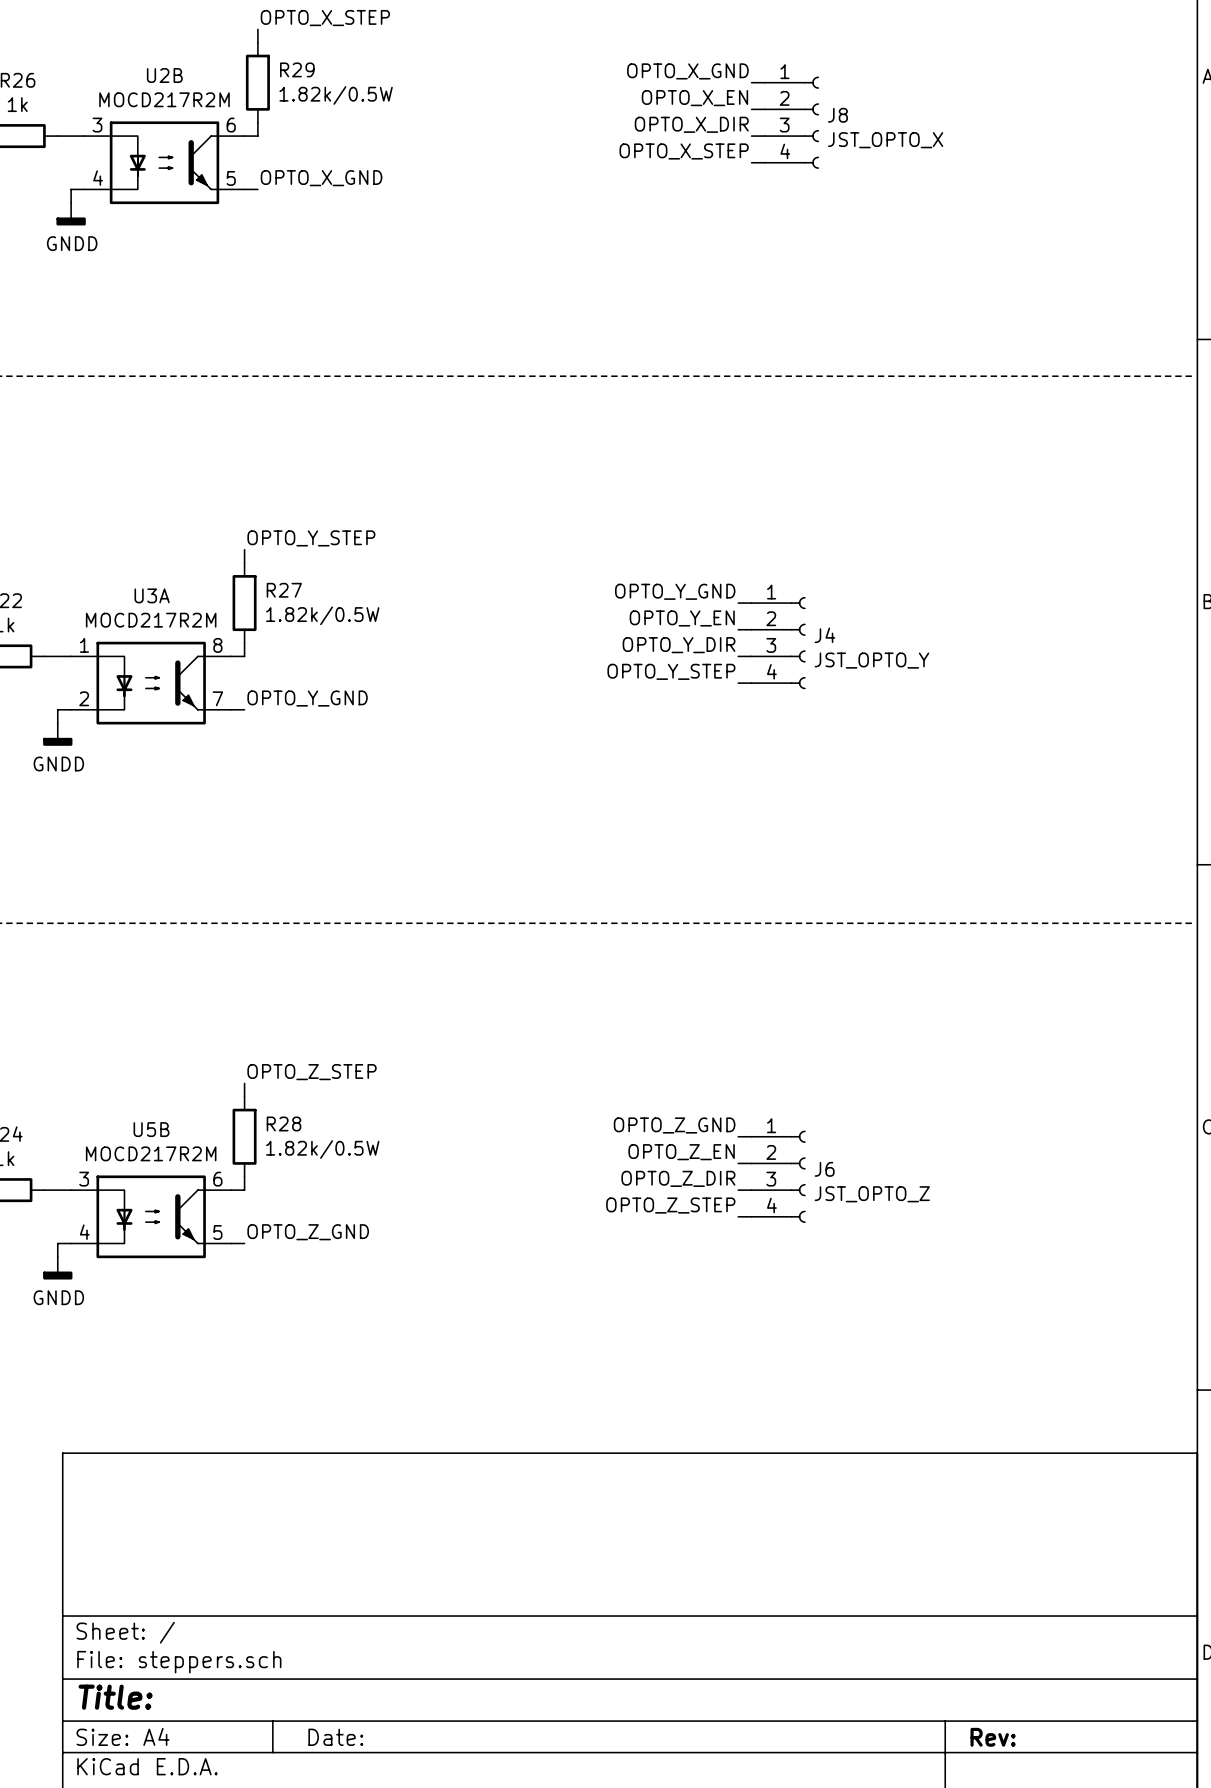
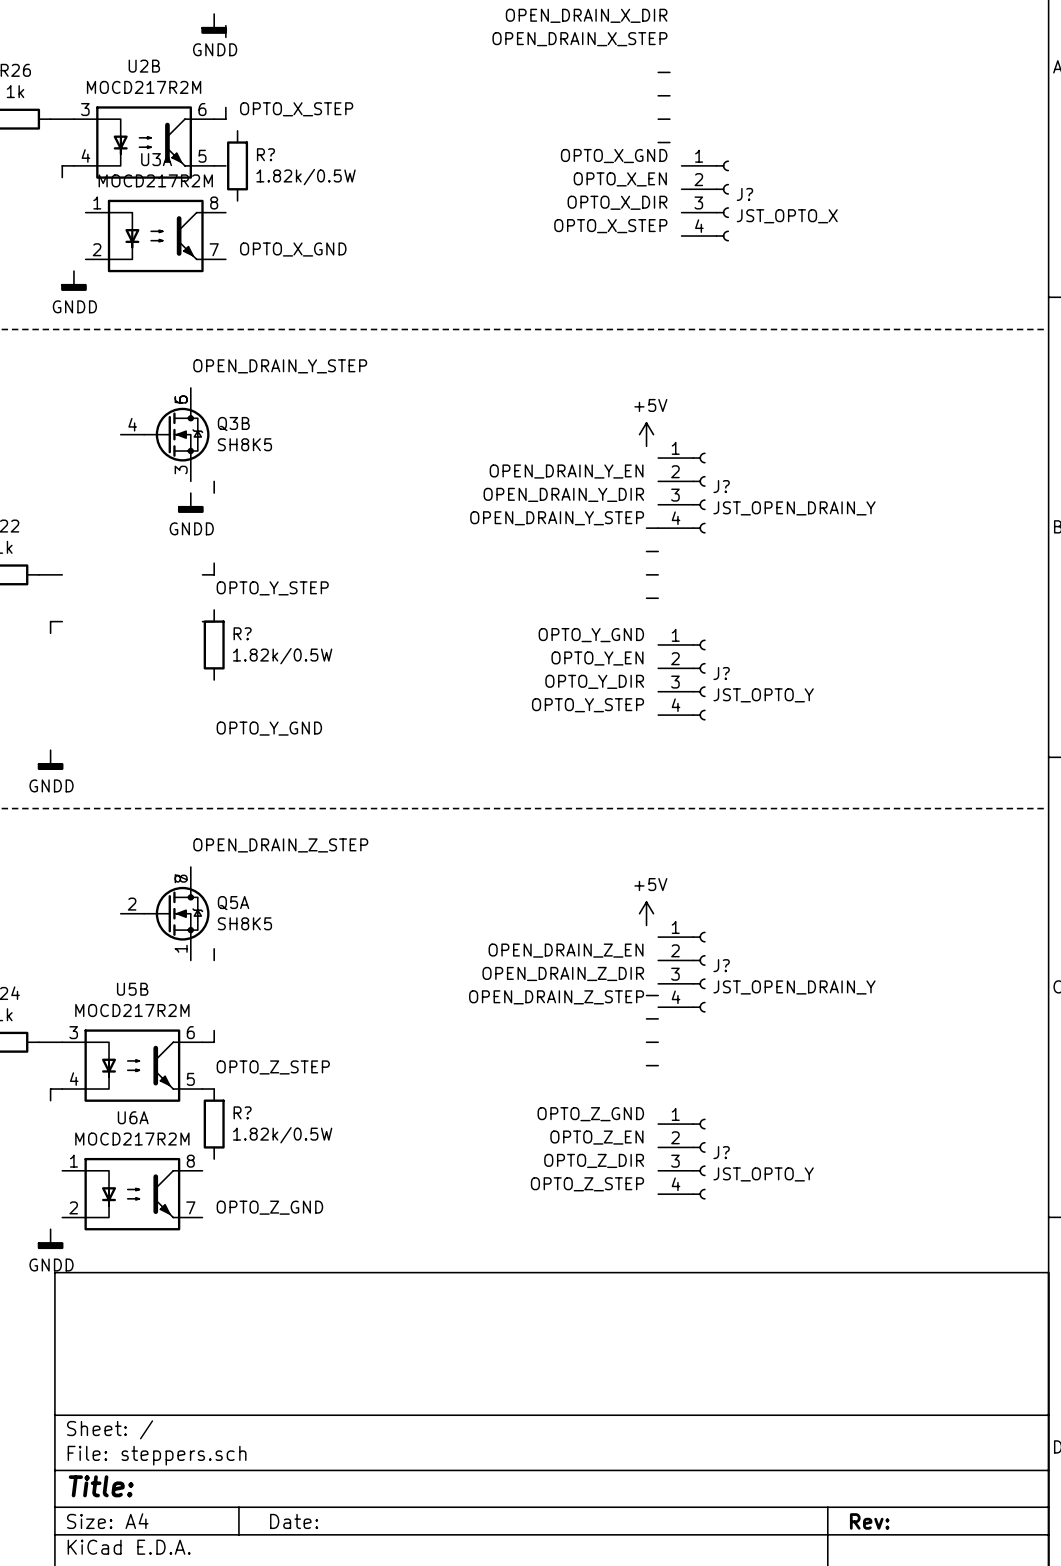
label position: OPTO_X_STEP (325, 18) -> OPTO_X_STEP (296, 109)
label: none -> OPEN_DRAIN_X_DIR (586, 15)
power symbol: none -> GNDD (214, 23)
label: none -> OPEN_DRAIN_X_STEP (579, 39)
label position: OPTO_X_GND (687, 71) -> OPTO_X_GND (614, 156)
R29: 1.82k/0.5W (257, 82) -> none
label position: OPTO_X_EN (694, 98) -> OPTO_X_EN (620, 179)
J8: JST_OPTO_X (792, 122) -> none
label position: OPTO_X_DIR (691, 124) -> OPTO_X_DIR (617, 202)
label position: OPTO_X_STEP (684, 151) -> OPTO_X_STEP (610, 226)
label position: OPTO_X_GND (321, 178) -> OPTO_X_GND (293, 249)
R?: none -> 1.82k/0.5W (237, 165)
power symbol position: GNDD (71, 214) -> GNDD (73, 280)
J?: none -> JST_OPTO_X (705, 200)
label: none -> OPEN_DRAIN_Y_STEP (280, 366)
Q3B: none -> SH8K5 (165, 434)
power symbol: none -> +5V (646, 434)
label position: OPTO_Y_STEP (311, 538) -> OPTO_Y_STEP (272, 588)
label: none -> OPEN_DRAIN_Y_EN (566, 471)
J?: none -> JST_OPEN_DRAIN_Y (681, 493)
label: none -> OPEN_DRAIN_Y_DIR (563, 494)
power symbol: none -> GNDD (190, 503)
label: OPTO_Y_GND (675, 591) -> OPEN_DRAIN_Y_STEP (557, 518)
R27: 1.82k/0.5W (244, 603) -> none
label position: OPTO_Y_EN (682, 618) -> OPTO_Y_EN (597, 658)
J4: JST_OPTO_Y (778, 643) -> none
label position: OPTO_Y_DIR (679, 645) -> OPTO_Y_DIR (594, 681)
label position: OPTO_Y_STEP (671, 671) -> OPTO_Y_STEP (588, 705)
U3A position: (151, 683) -> (155, 236)
label position: OPTO_Y_GND (307, 698) -> OPTO_Y_GND (269, 728)
label: none -> OPTO_Y_GND (591, 635)
power symbol: GNDD (57, 734) -> none
R?: none -> 1.82k/0.5W (214, 644)
J?: none -> JST_OPTO_Y (681, 680)
power symbol: none -> GNDD (50, 760)
label: none -> OPEN_DRAIN_Z_STEP (280, 845)
Q5A: none -> SH8K5 (165, 913)
power symbol: none -> +5V (646, 913)
label position: OPTO_Z_STEP (312, 1072) -> OPTO_Z_STEP (273, 1067)
label: none -> OPEN_DRAIN_Z_EN (566, 950)
J?: none -> JST_OPEN_DRAIN_Y (681, 972)
label: none -> OPEN_DRAIN_Z_DIR (563, 973)
label position: OPTO_Z_GND (674, 1125) -> OPTO_Z_GND (590, 1114)
R28: 1.82k/0.5W (244, 1136) -> none
label: none -> OPEN_DRAIN_Z_STEP (556, 997)
label position: OPTO_Z_EN (681, 1152) -> OPTO_Z_EN (596, 1137)
J6: JST_OPTO_Z (778, 1176) -> none
label position: OPTO_Z_DIR (678, 1178) -> OPTO_Z_DIR (594, 1160)
label position: OPTO_Z_STEP (670, 1205) -> OPTO_Z_STEP (587, 1184)
label position: OPTO_Z_GND (308, 1232) -> OPTO_Z_GND (269, 1207)
power symbol position: GNDD (57, 1268) -> GNDD (50, 1239)
R?: none -> 1.82k/0.5W (214, 1124)
J?: none -> JST_OPTO_Y (681, 1159)
U6A: none -> MOCD217R2M (132, 1194)

